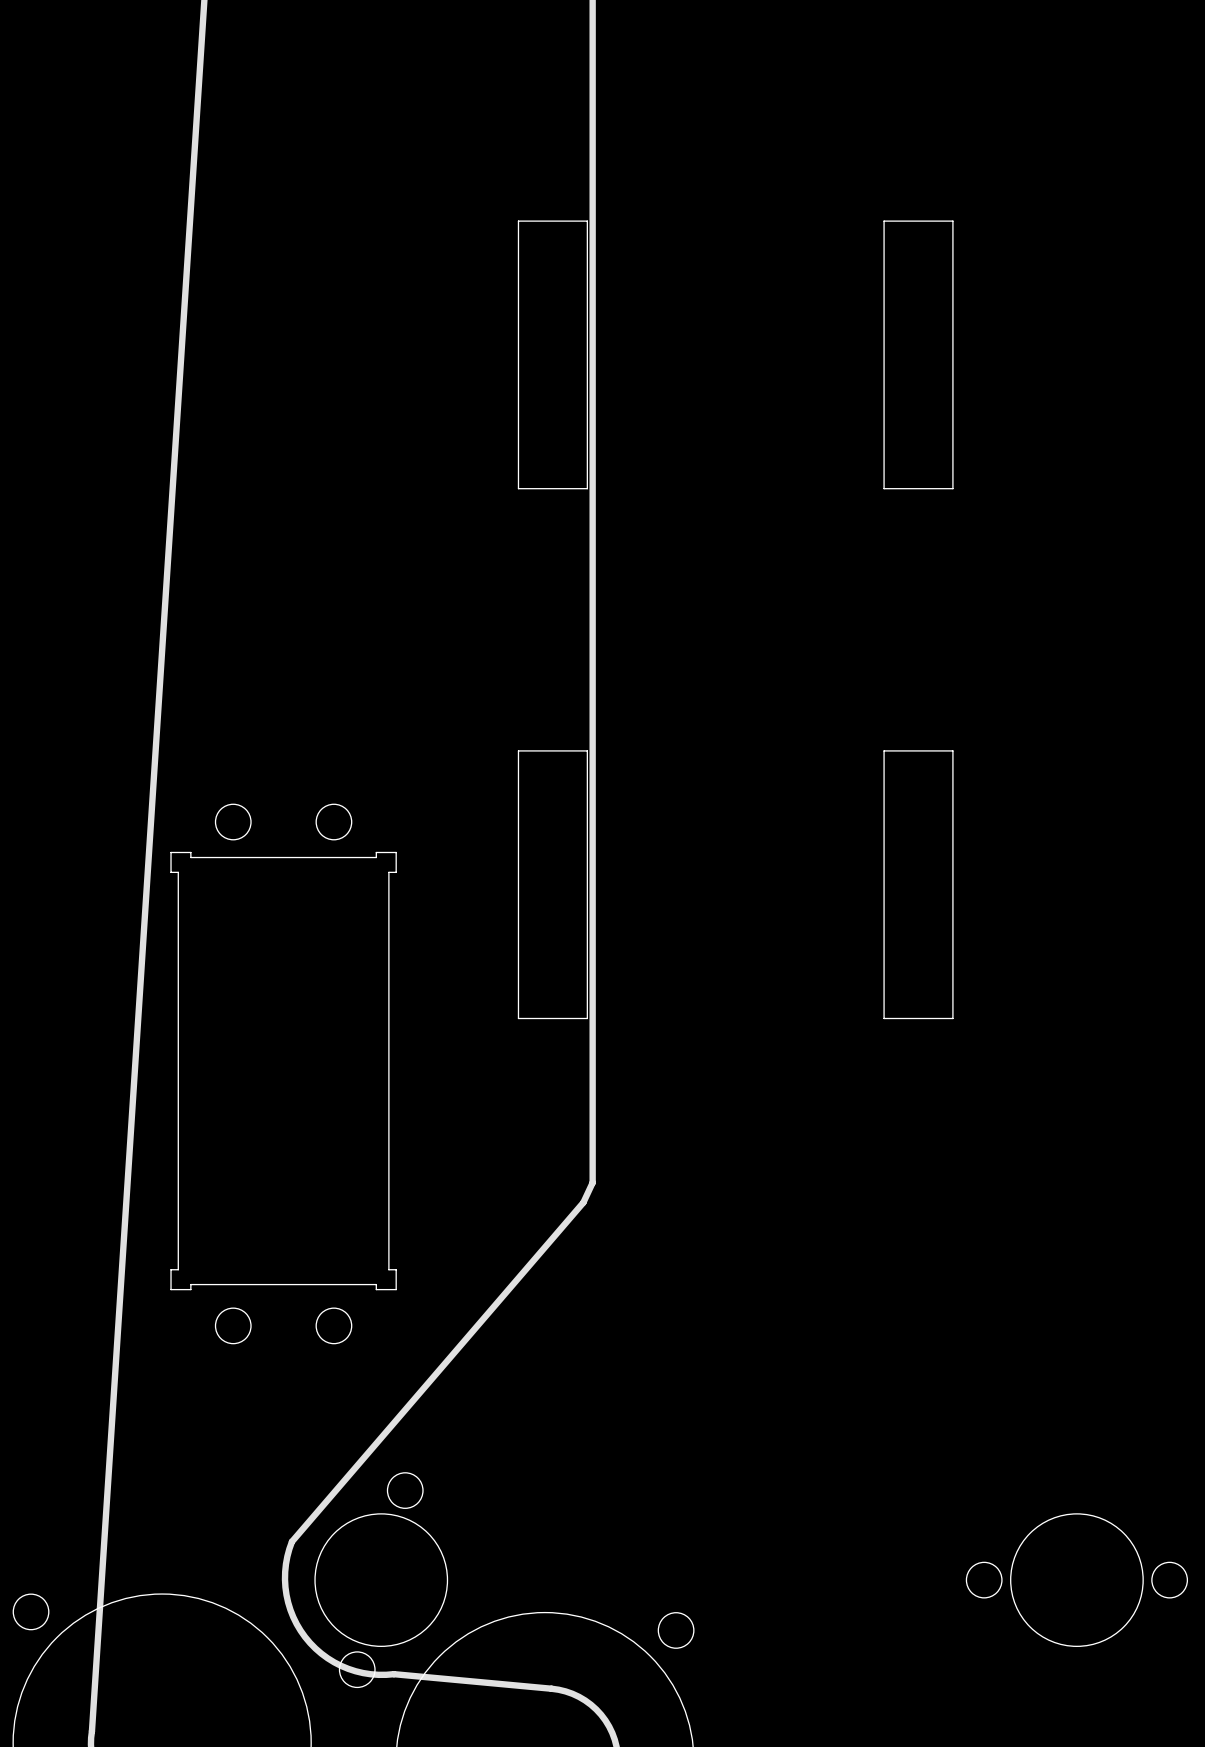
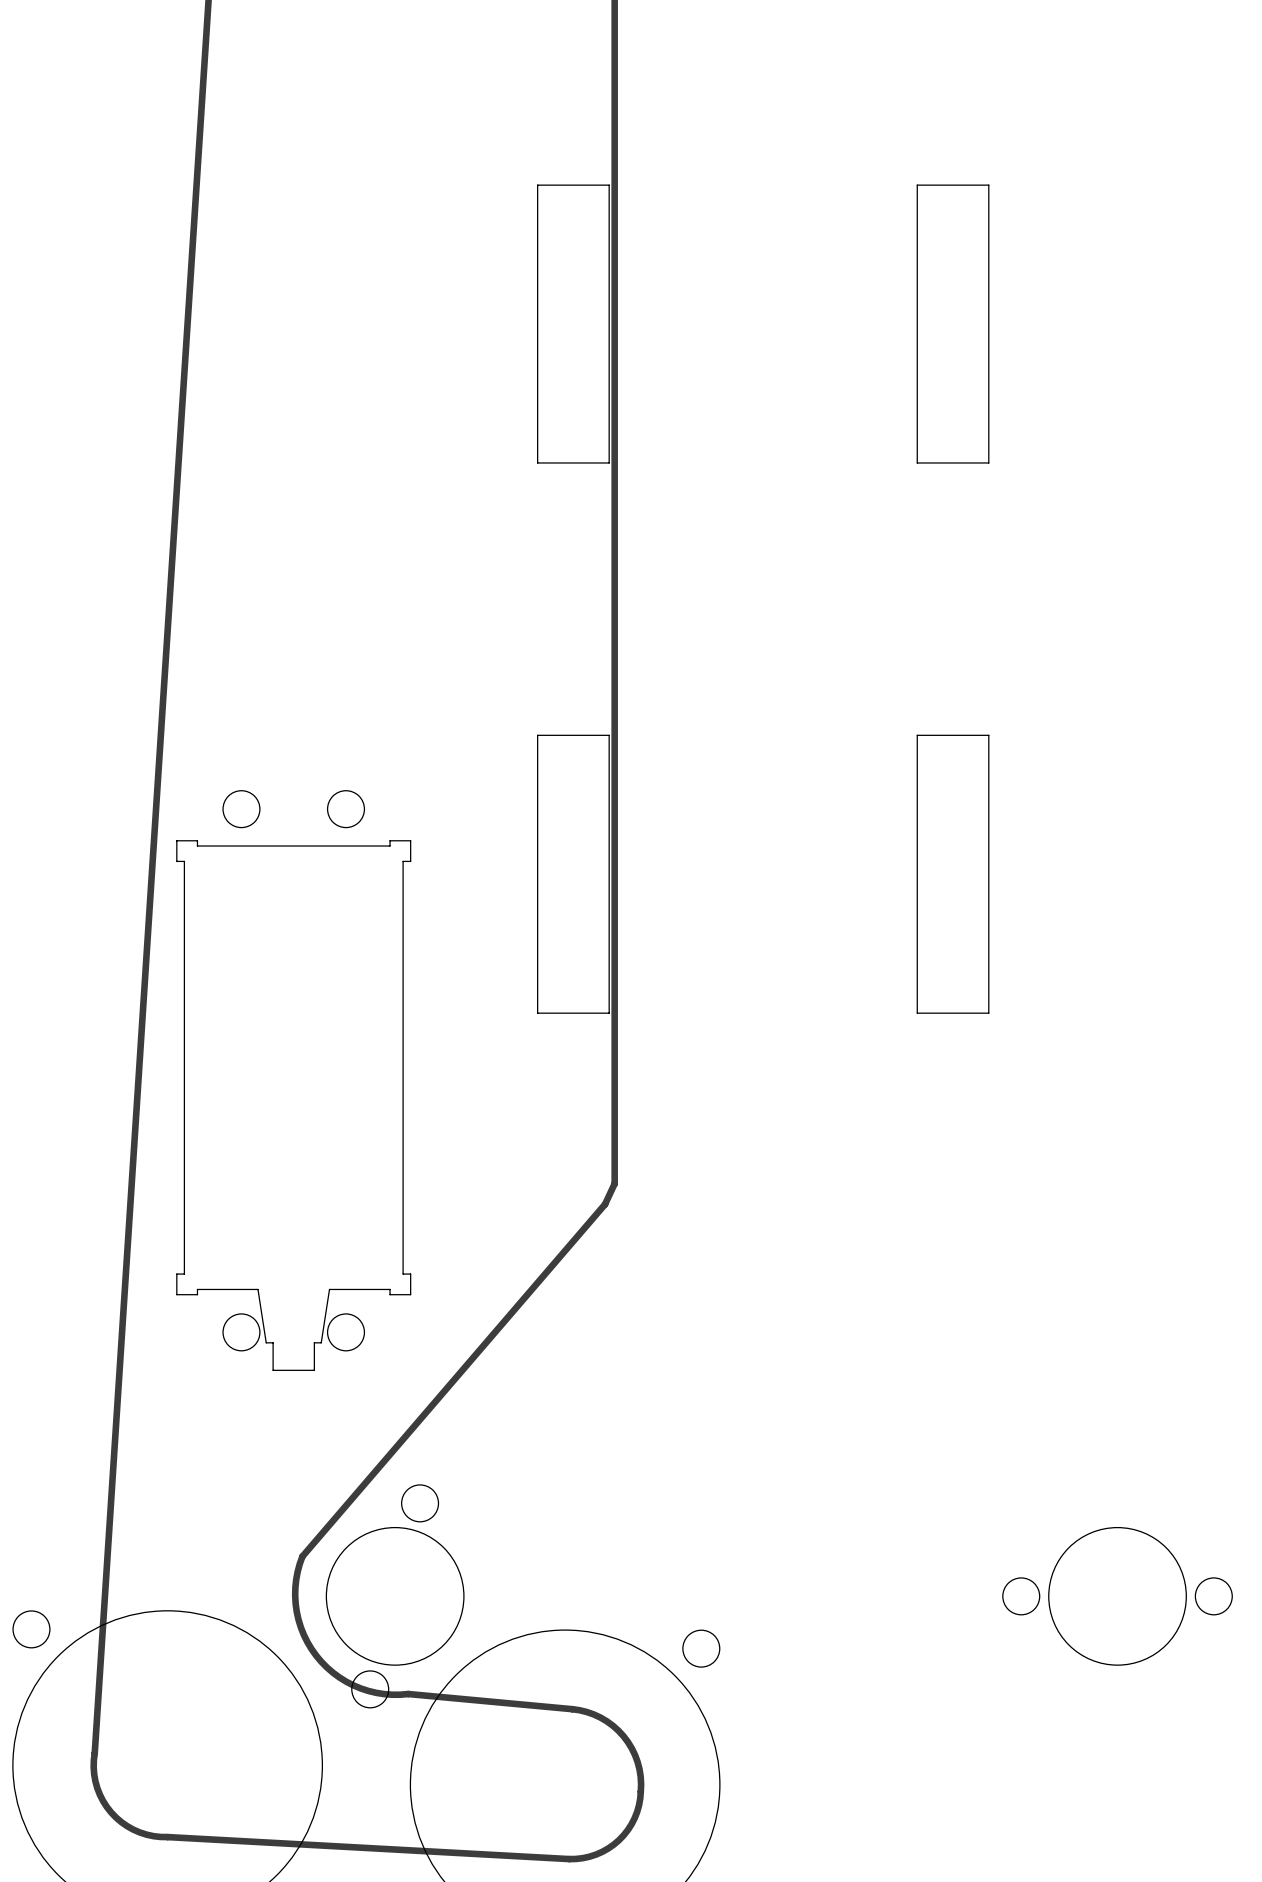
drawing shape: [170, 804, 397, 1344] -> [176, 790, 411, 1371]

